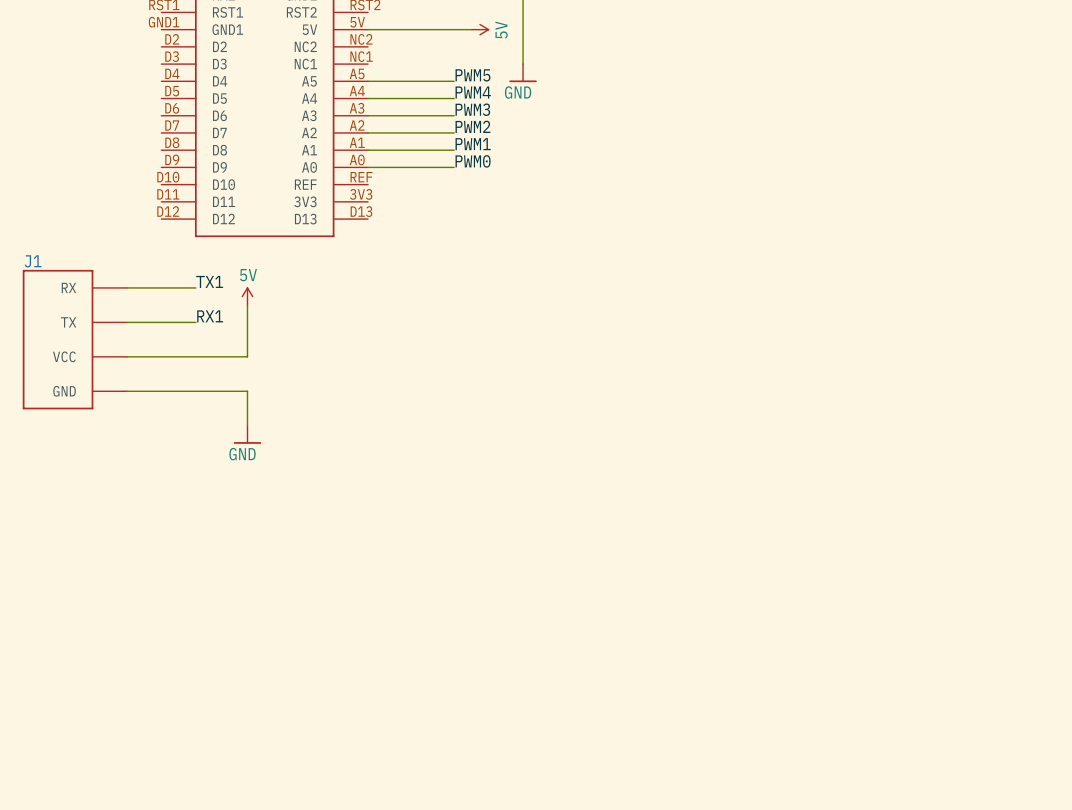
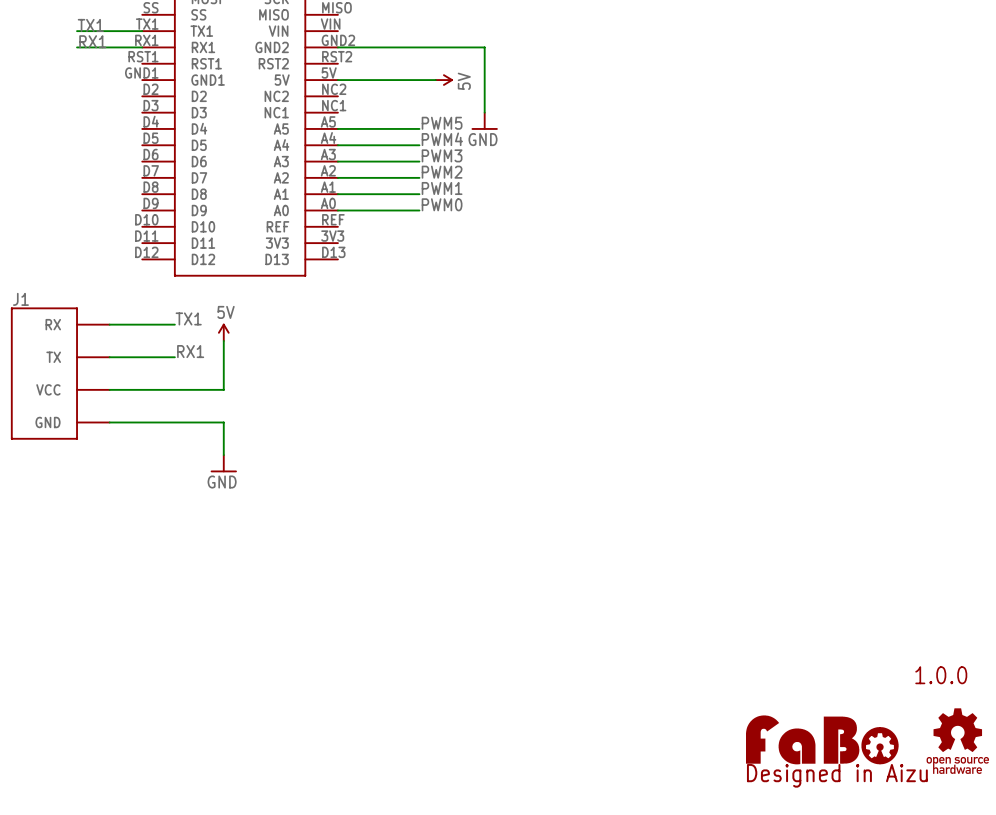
text: none -> 1.0.0 (941, 675)
part: none -> (822, 739)
part: none -> (957, 741)

